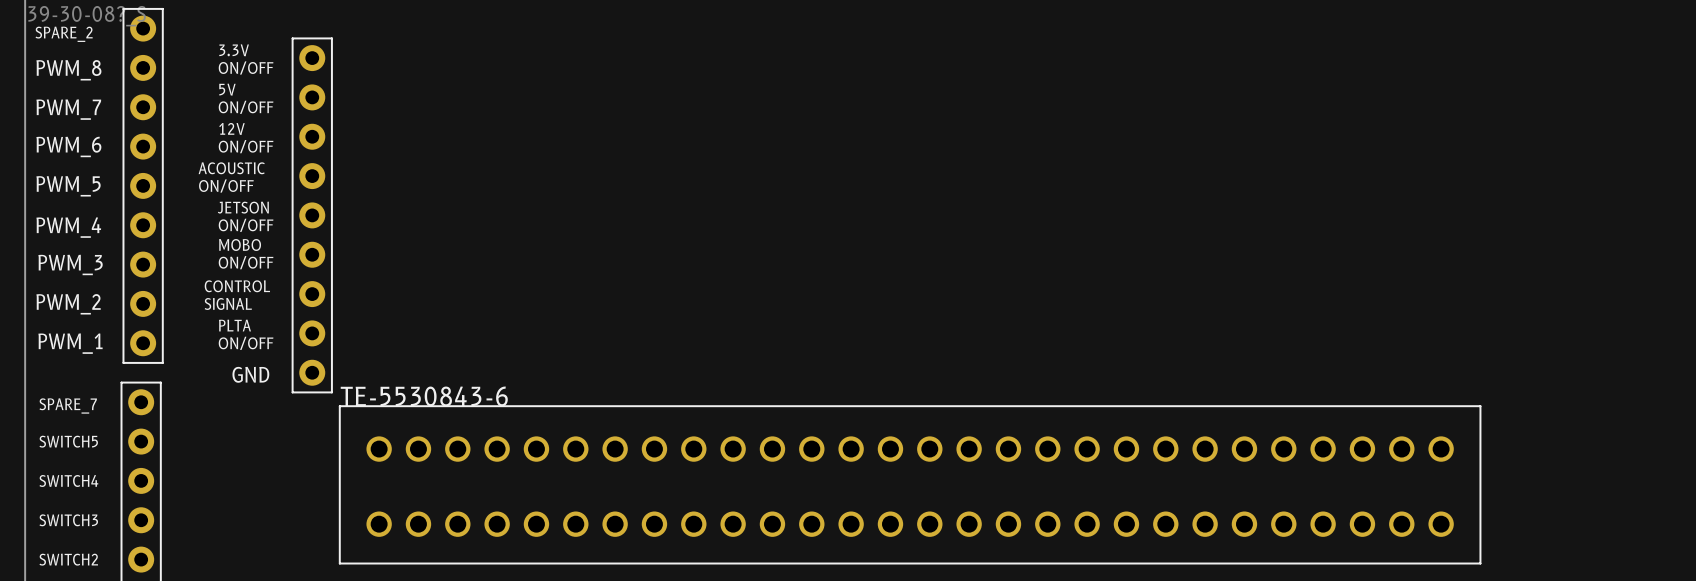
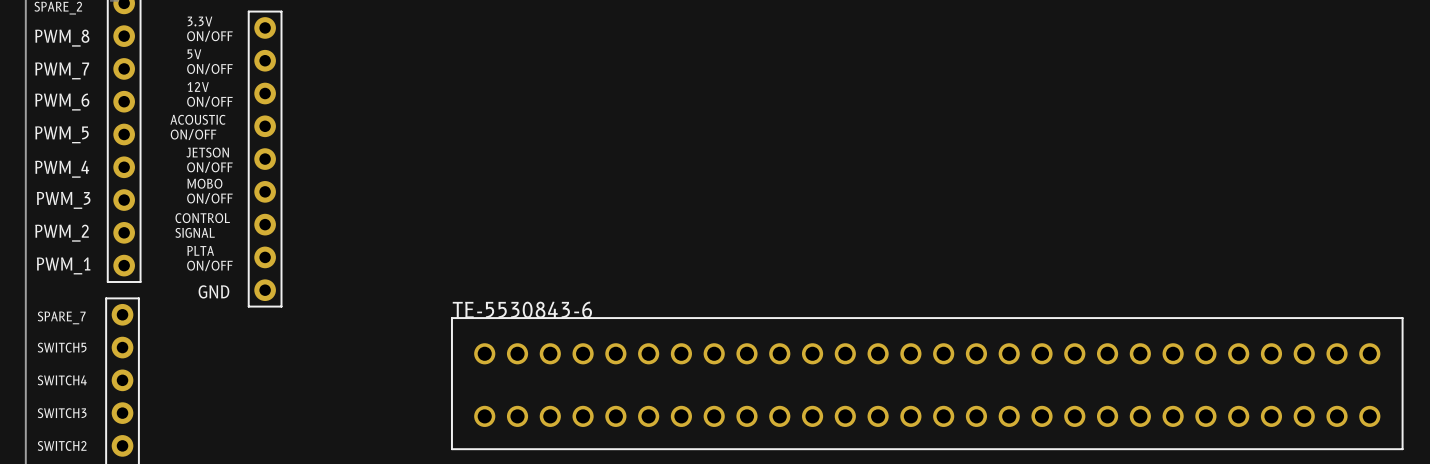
part position: (910, 484) -> (927, 383)

